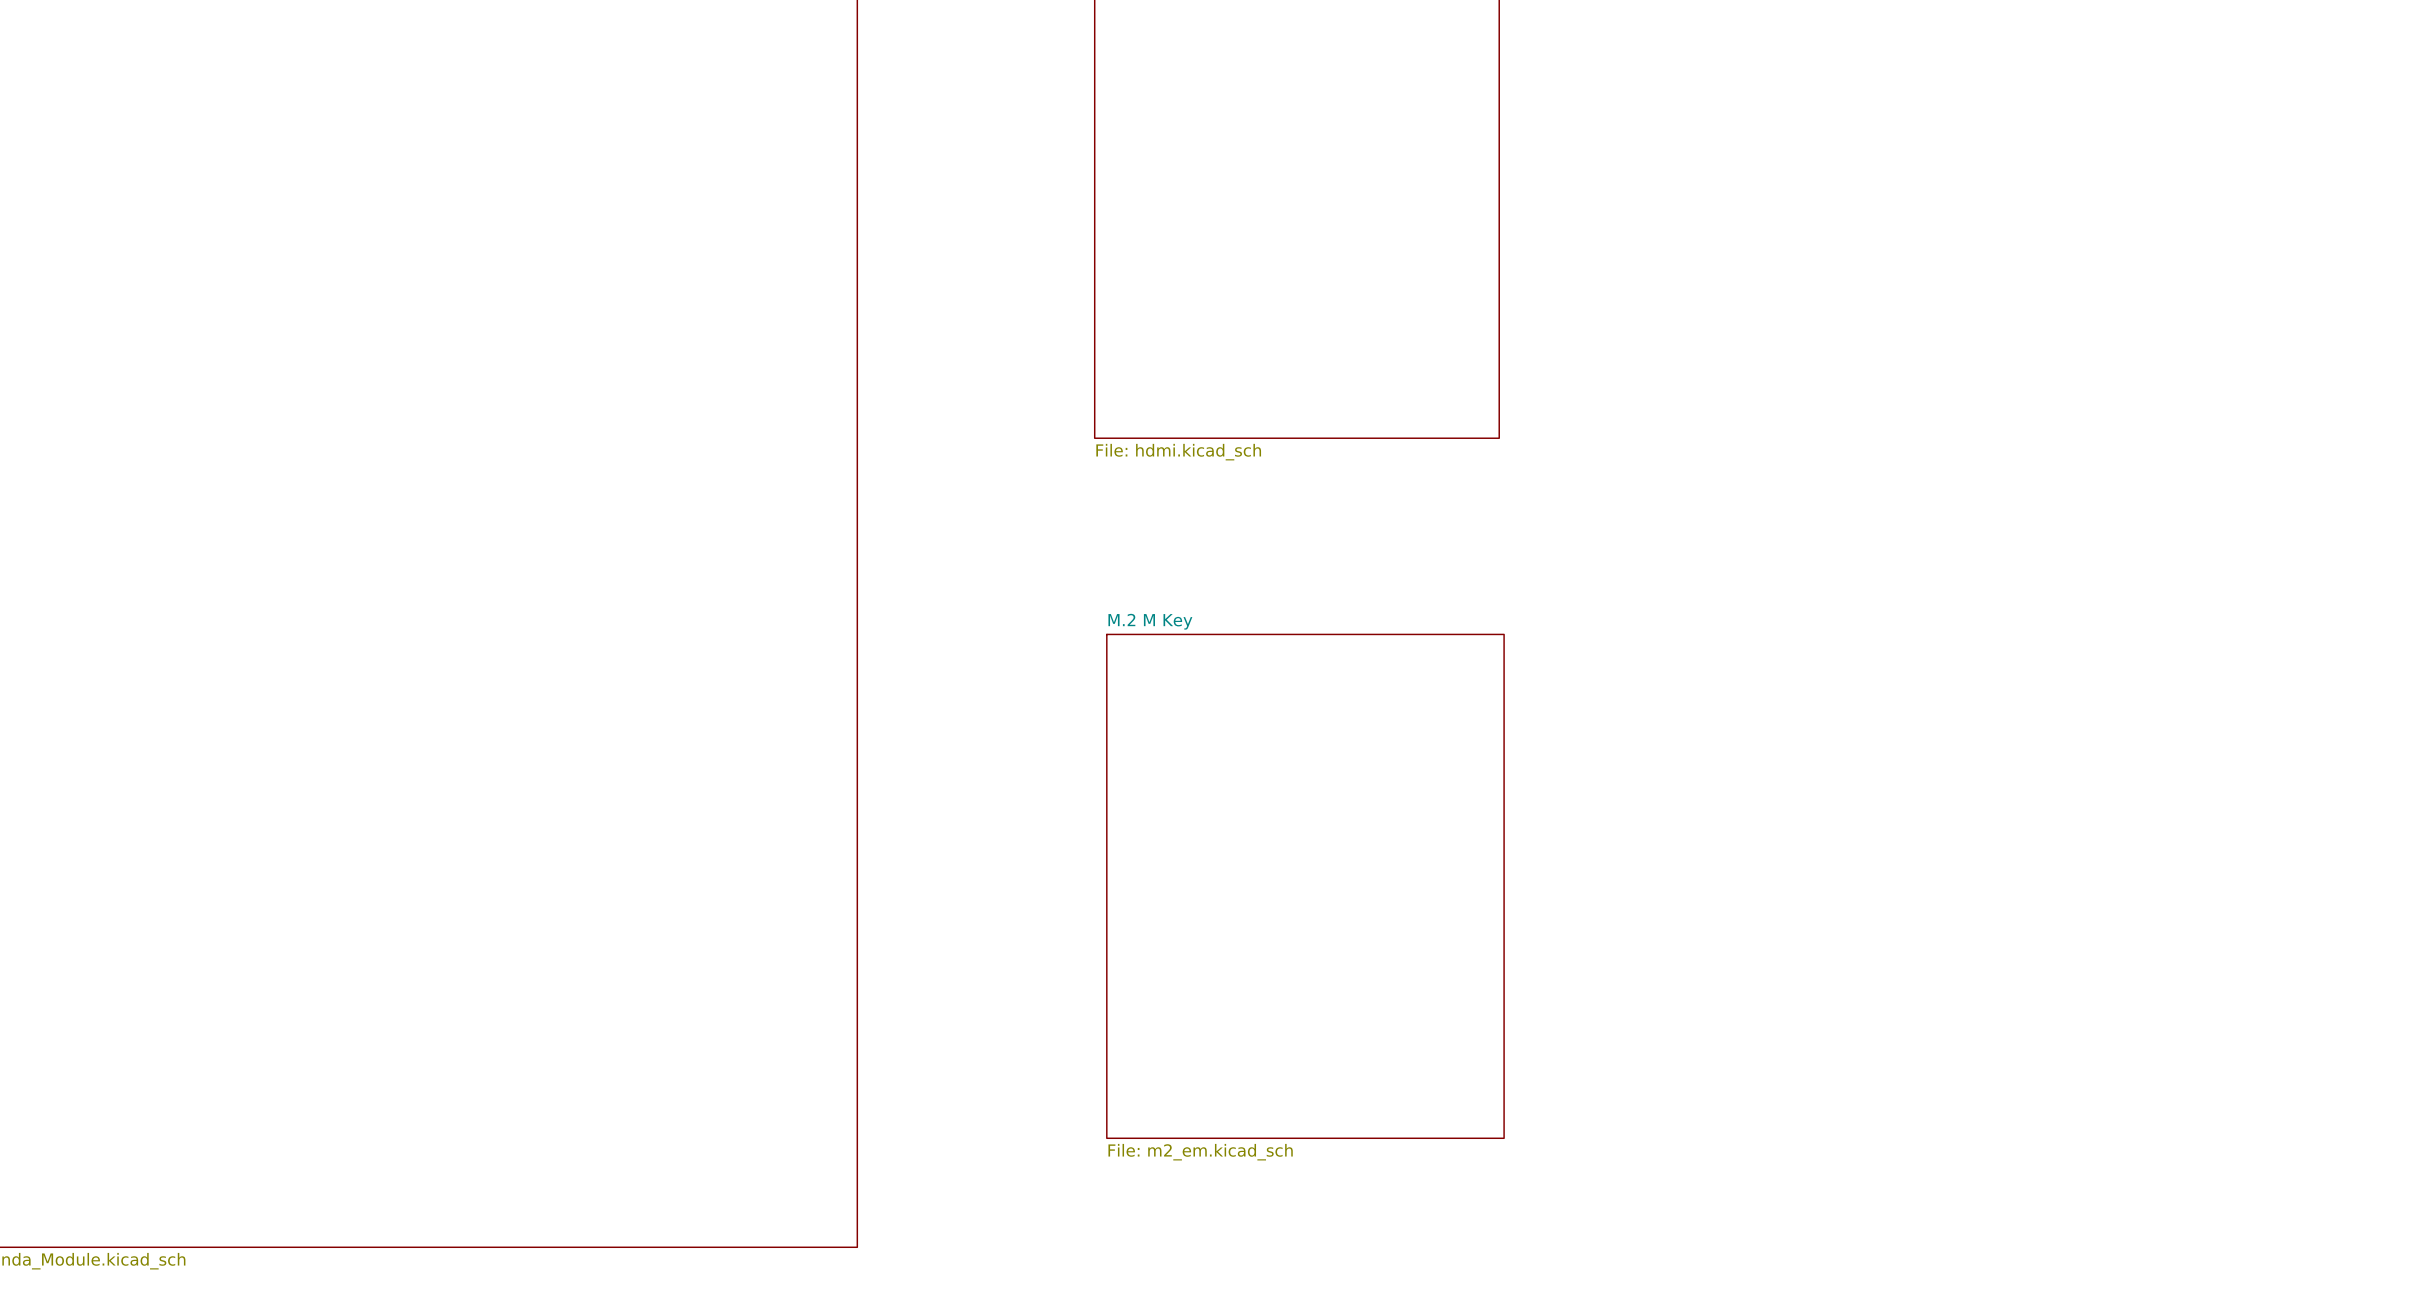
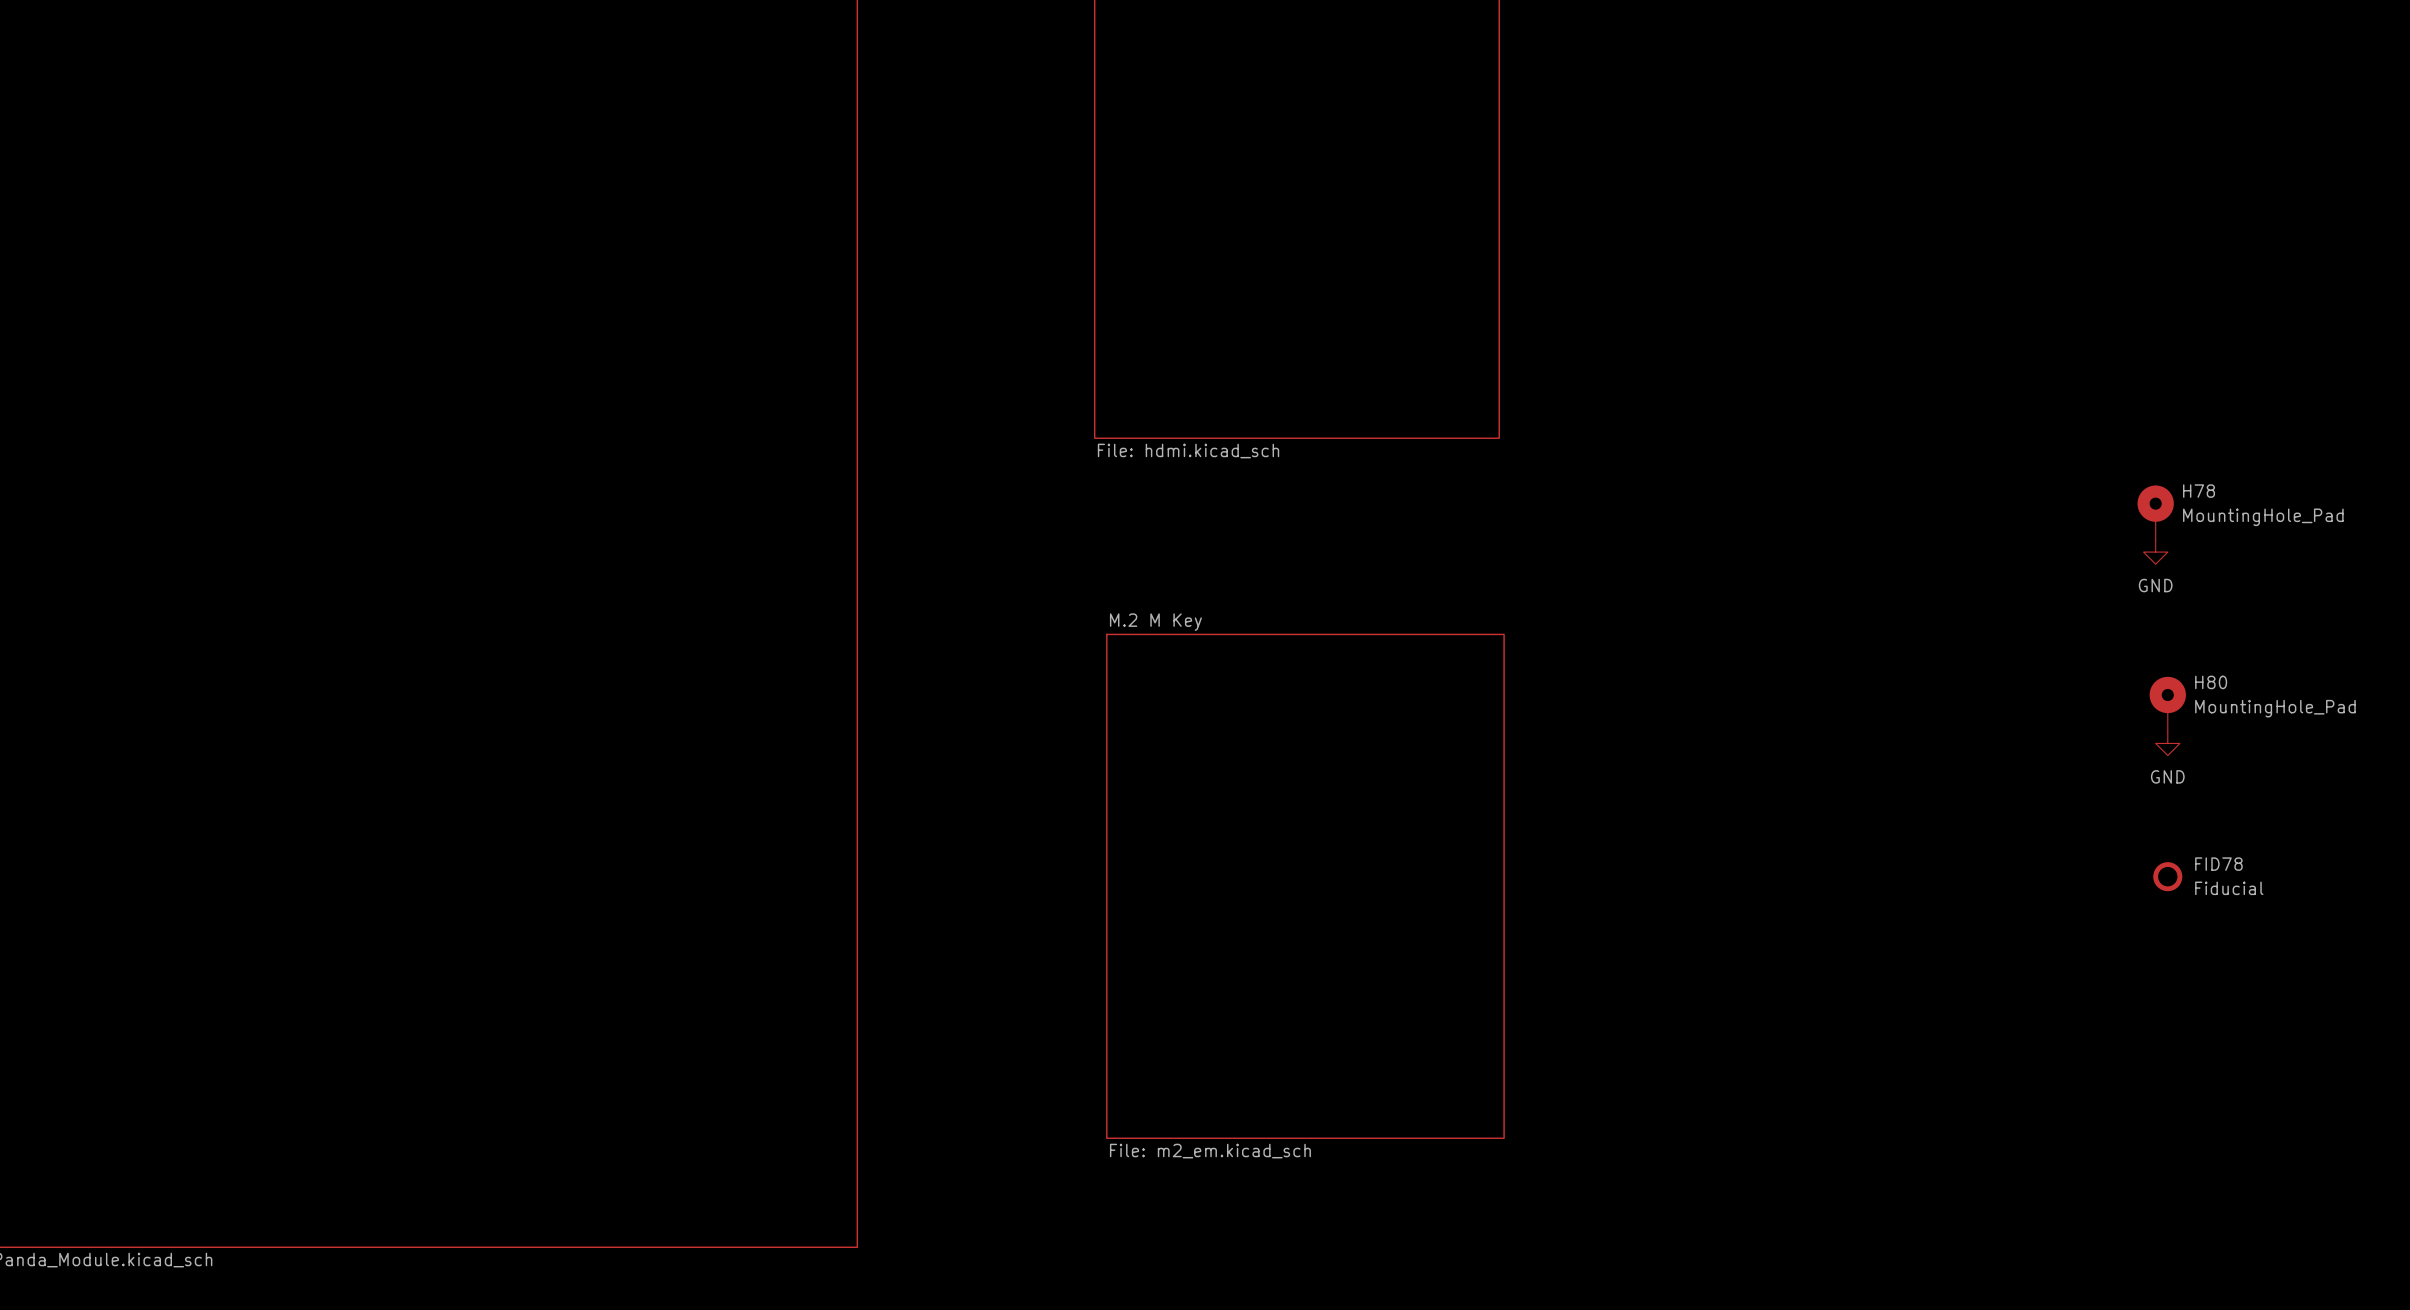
H78: none -> MountingHole_Pad (2155, 512)
power symbol: none -> GND (2155, 552)
H80: none -> MountingHole_Pad (2167, 704)
power symbol: none -> GND (2167, 743)
FID78: none -> Fiducial (2167, 876)

